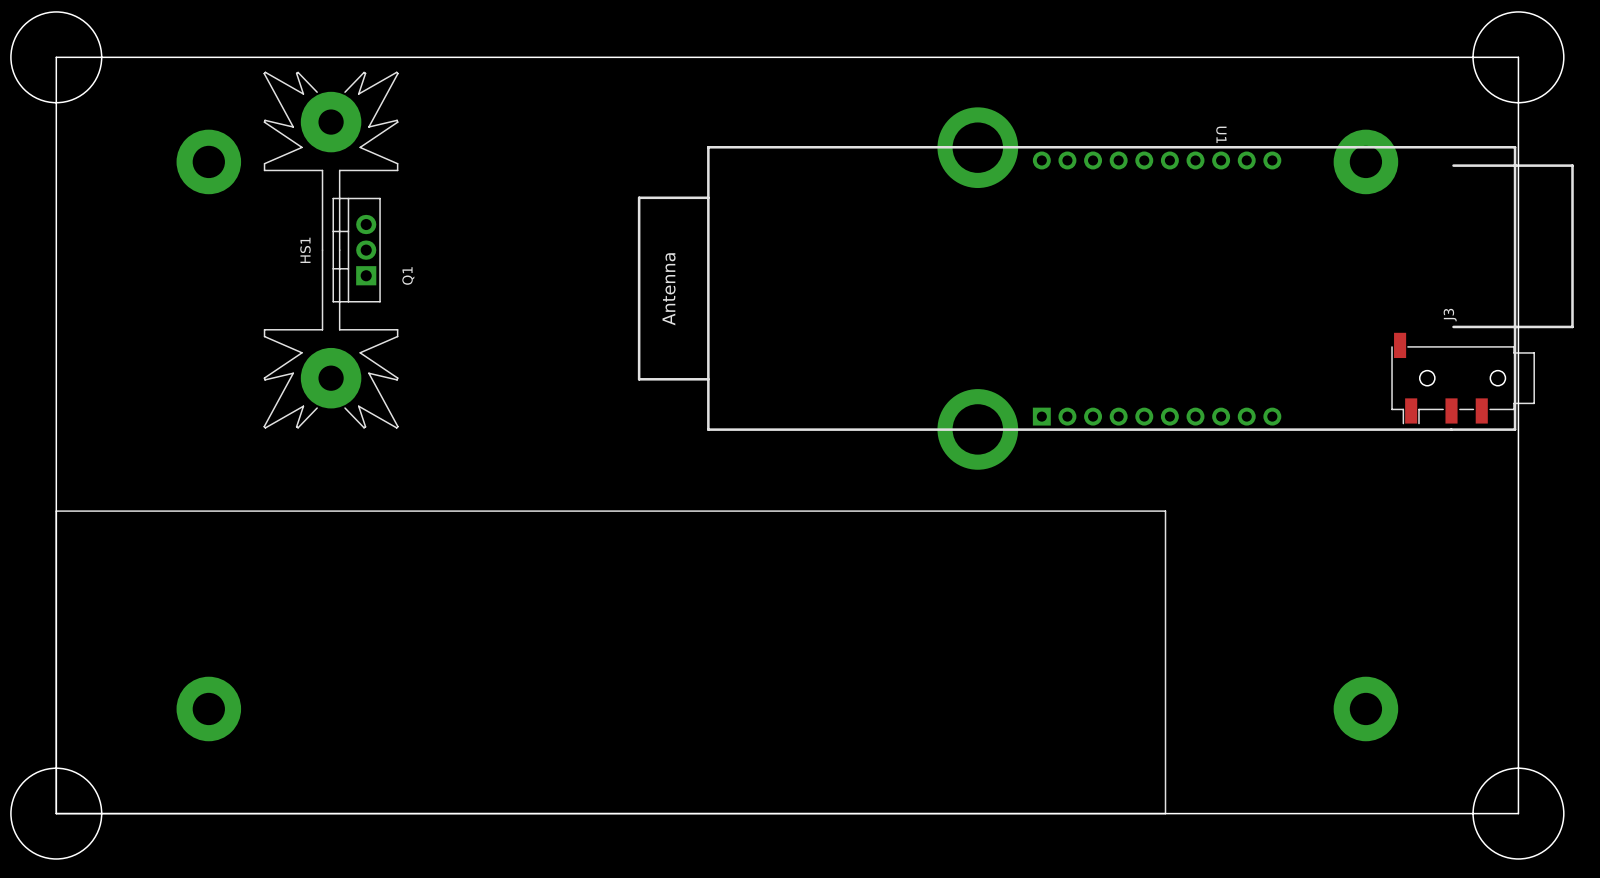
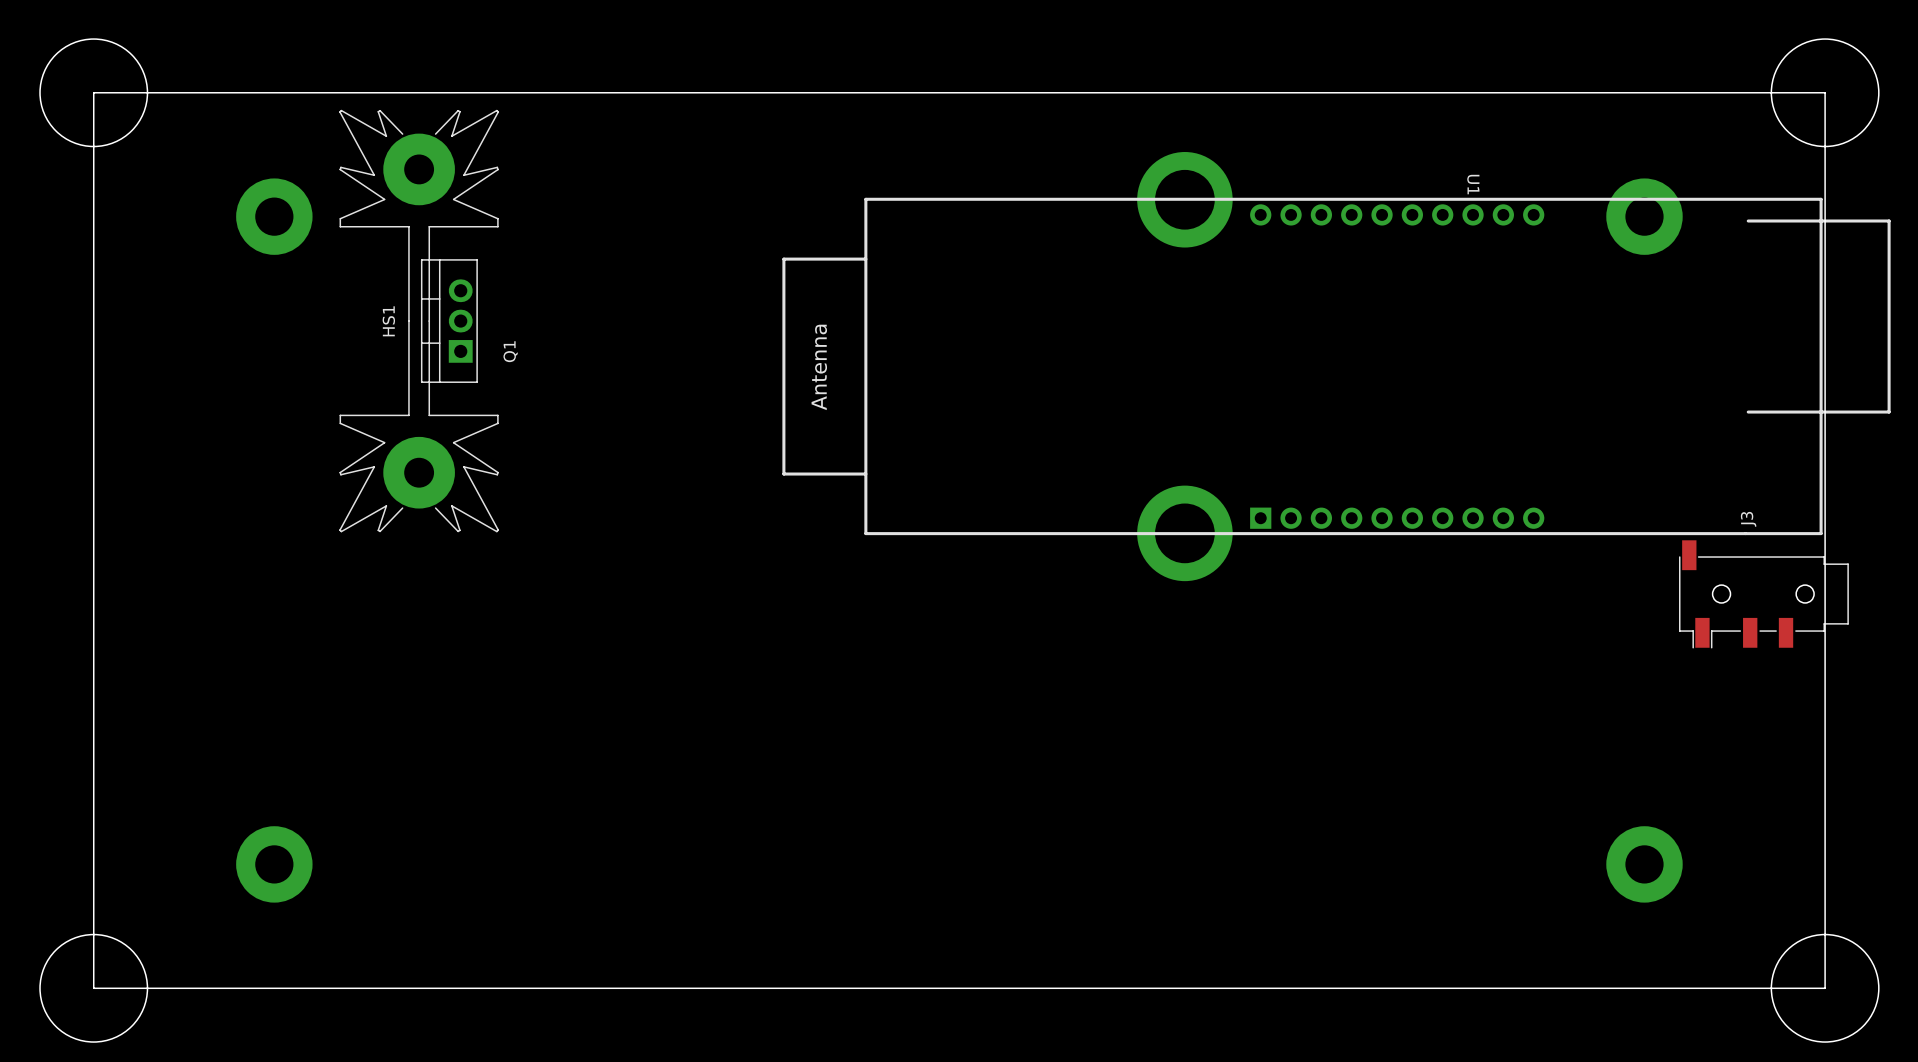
J3 position: (1463, 378) -> (1763, 594)
line: (56, 511) (1165, 511) (1165, 813) (56, 813) (56, 511) -> none

